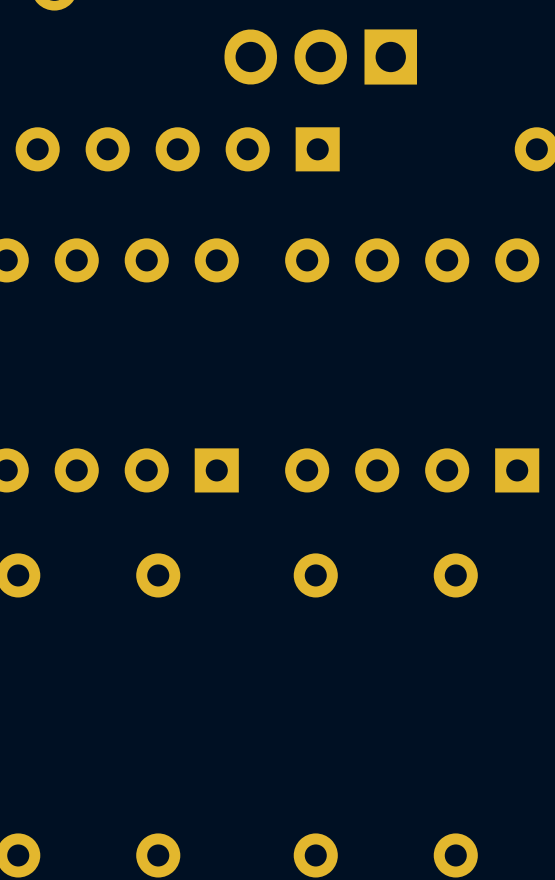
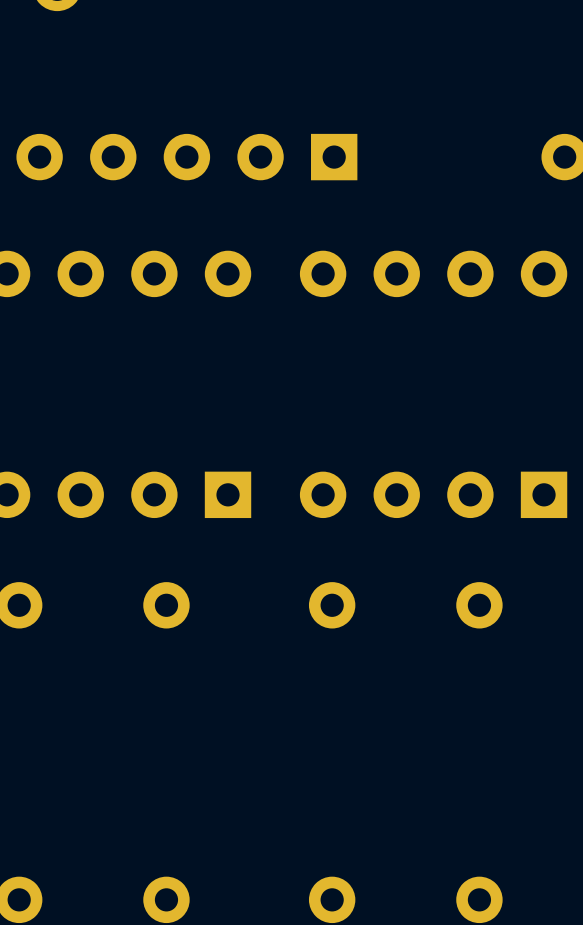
part: (320, 57) -> none

